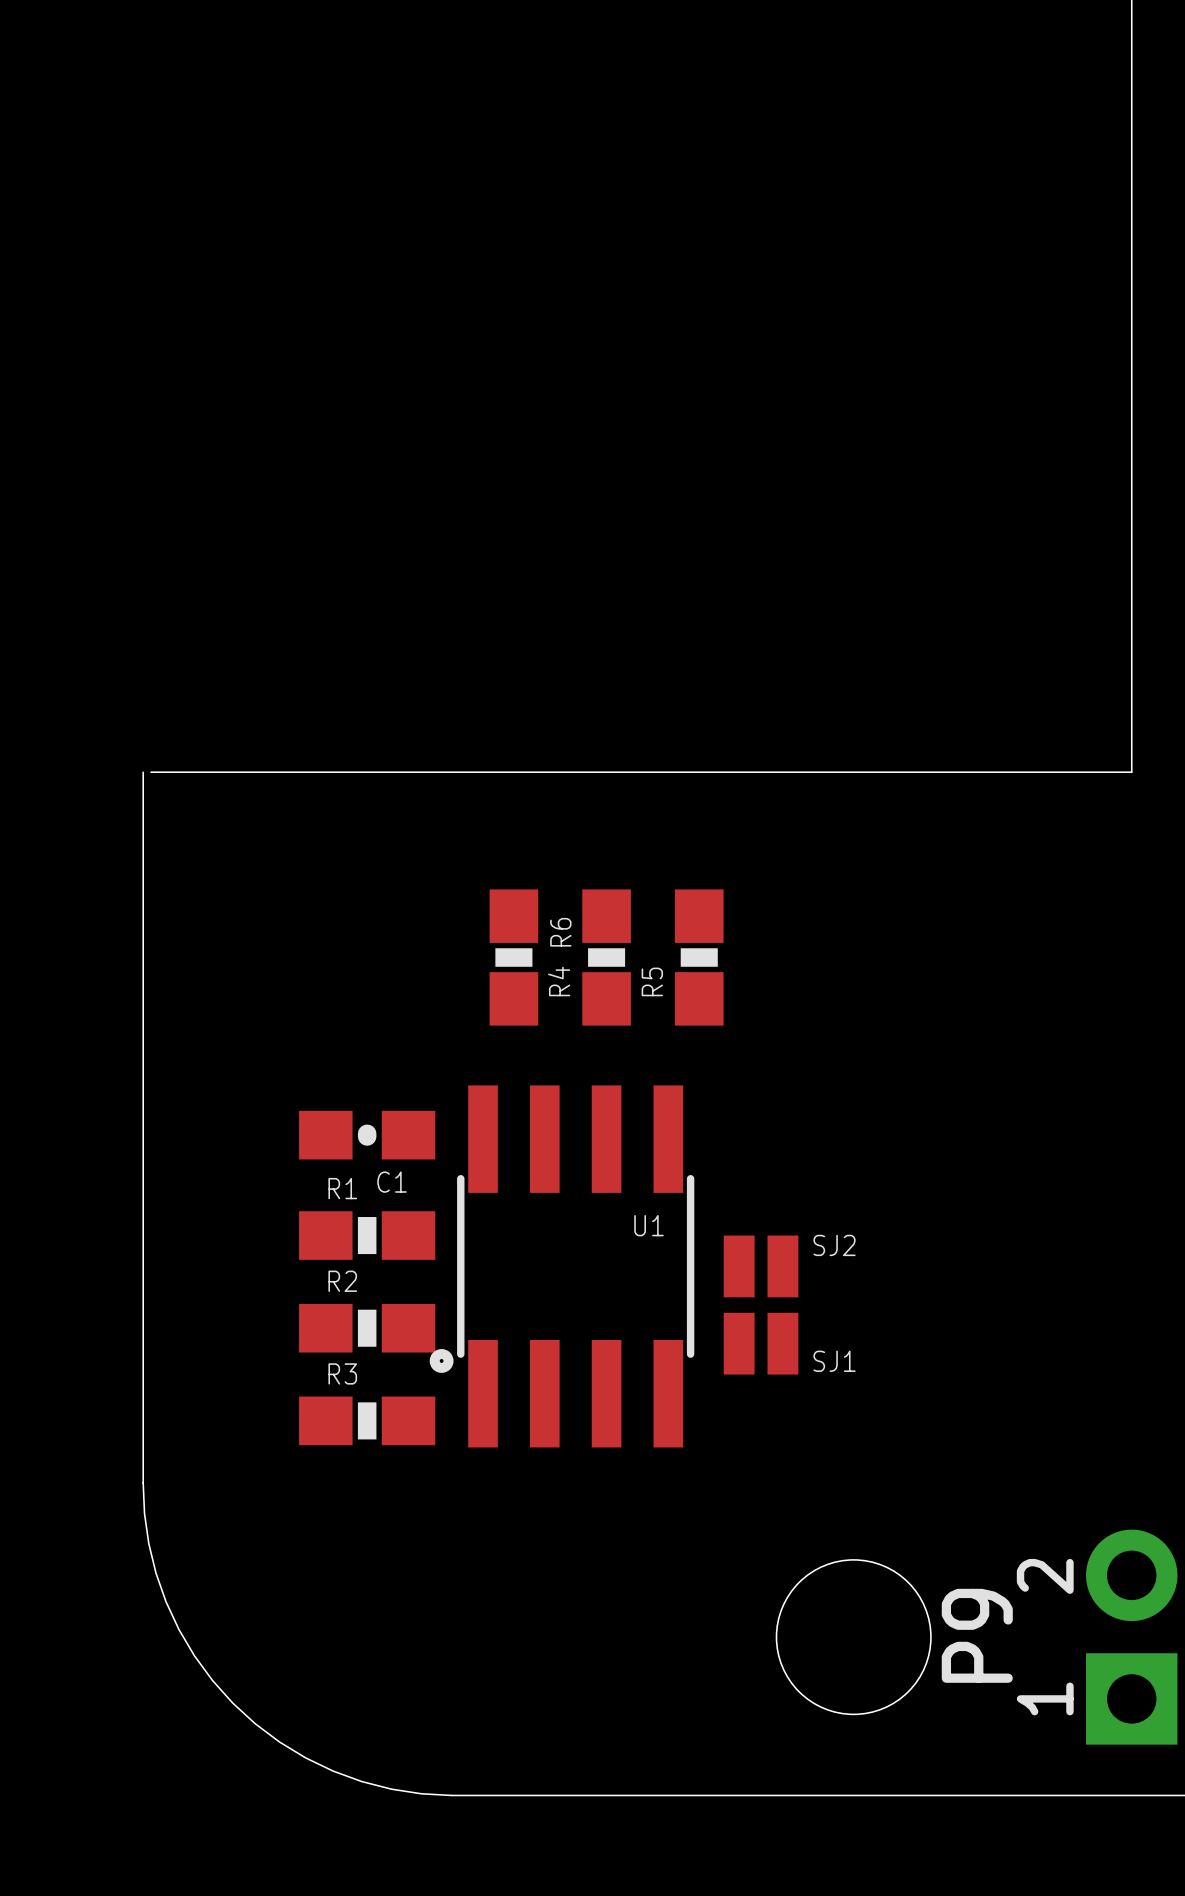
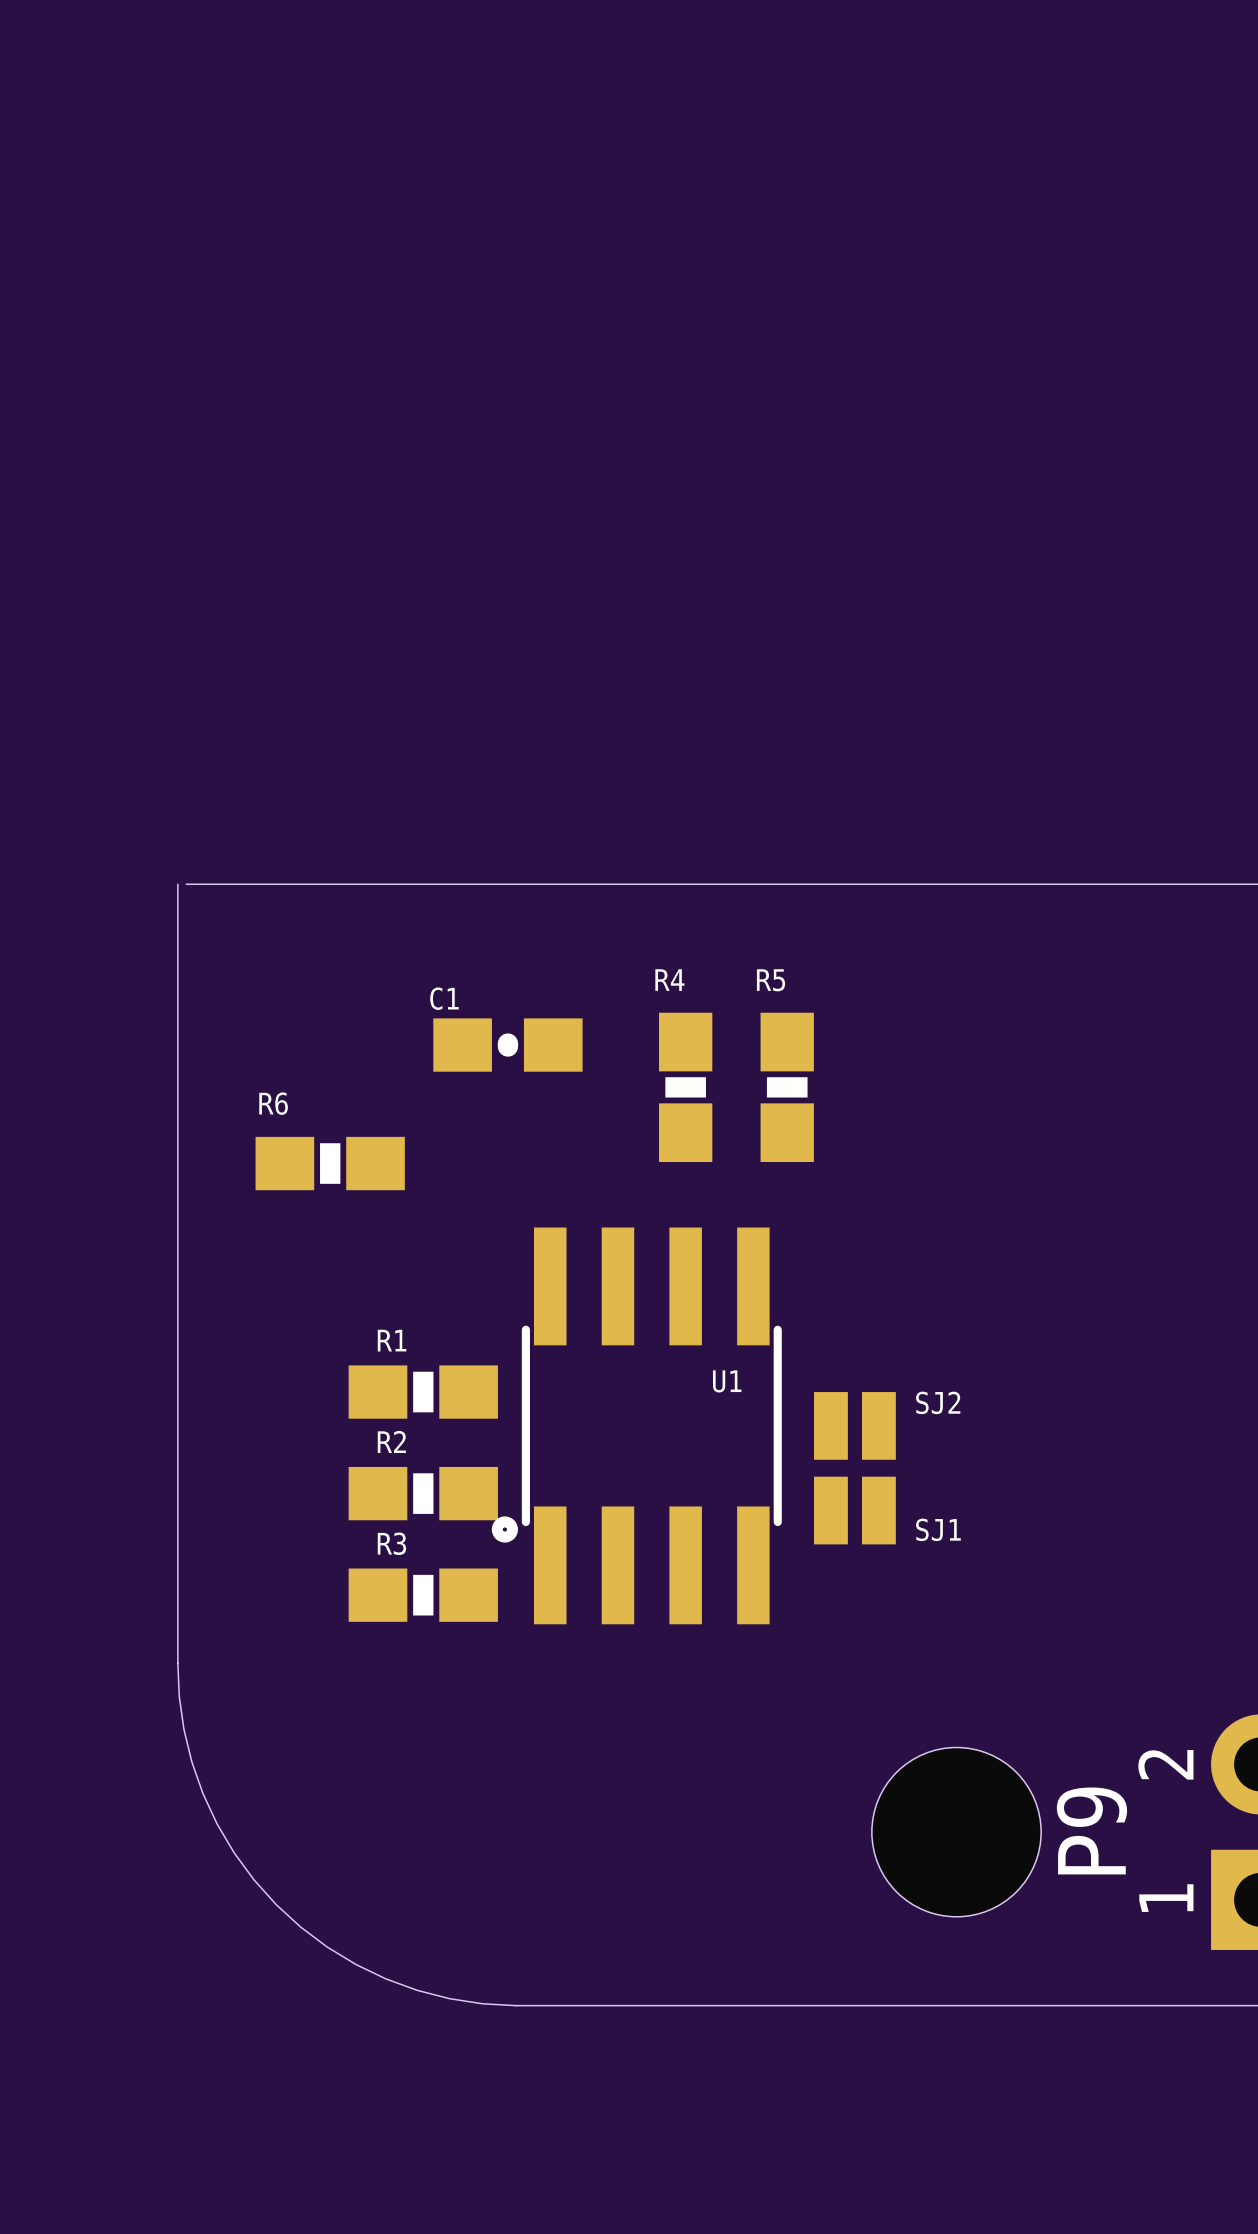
R6 name position: R6 (560, 932) -> R6 (273, 1103)
R6 rotation: 0° (513, 957) -> 90° clockwise (330, 1163)
R6 position: (513, 957) -> (330, 1163)
R4 name rotation: 0° (559, 981) -> 90° clockwise (669, 980)
R4 name position: R4 (559, 981) -> R4 (669, 980)
R5 name rotation: 0° (652, 981) -> 90° clockwise (771, 980)
R5 name position: R5 (652, 981) -> R5 (771, 980)
C1 position: (367, 1135) -> (507, 1045)
C1 name position: C1 (392, 1182) -> C1 (444, 998)

